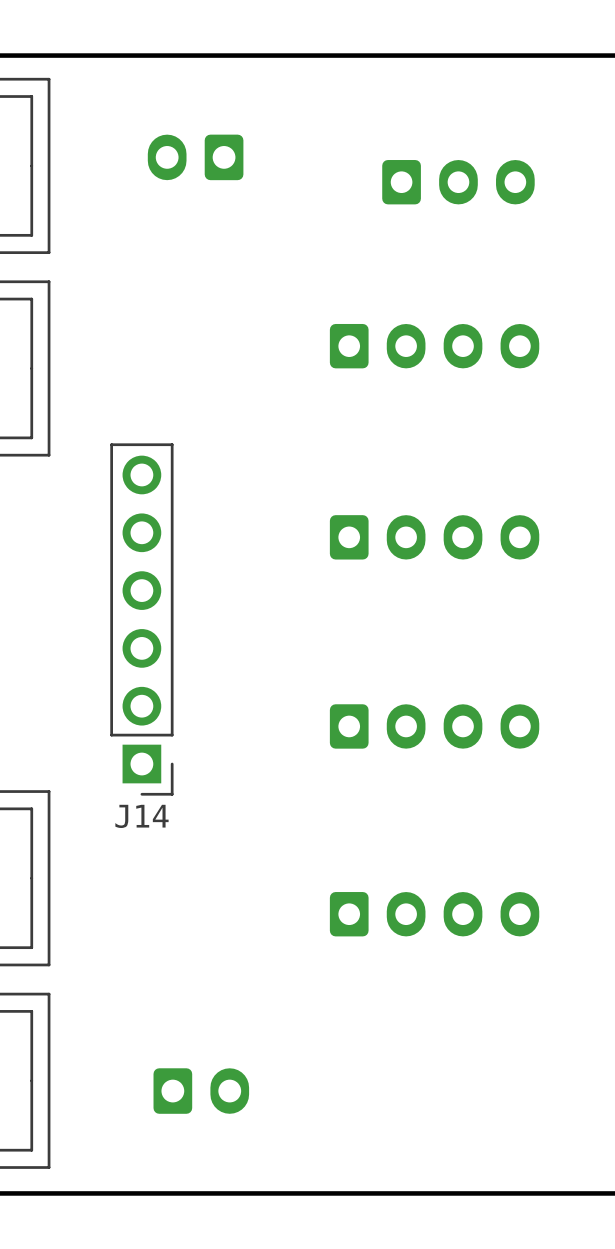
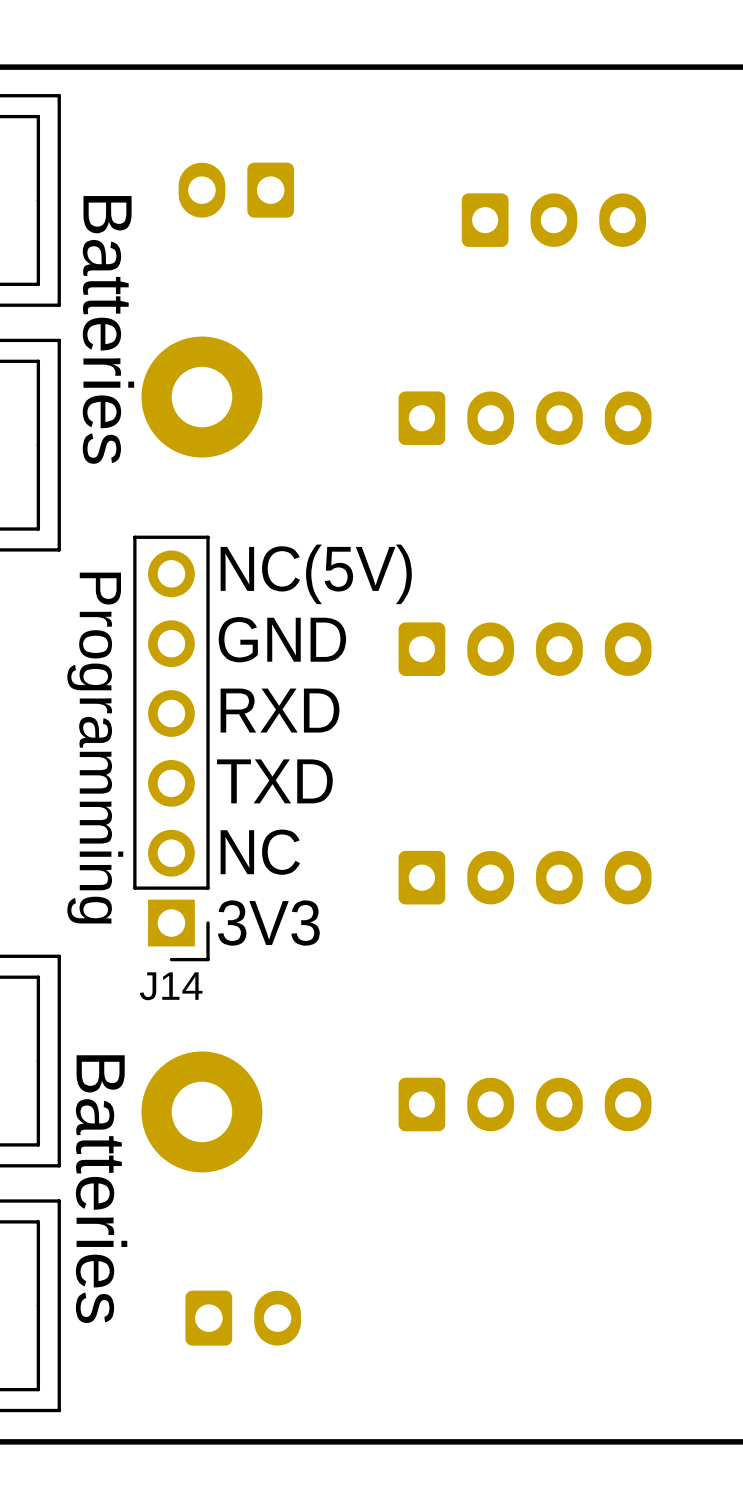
text: none -> Batteries (108, 329)
part: none -> (201, 397)
text: none -> NC(5V) (316, 574)
text: none -> GND (282, 639)
text: none -> RXD (280, 710)
text: none -> Programming (95, 748)
text: none -> TXD (274, 781)
text: none -> NC (260, 852)
text: none -> 3V3 (268, 923)
part: none -> (201, 1111)
text: none -> Batteries (101, 1189)

